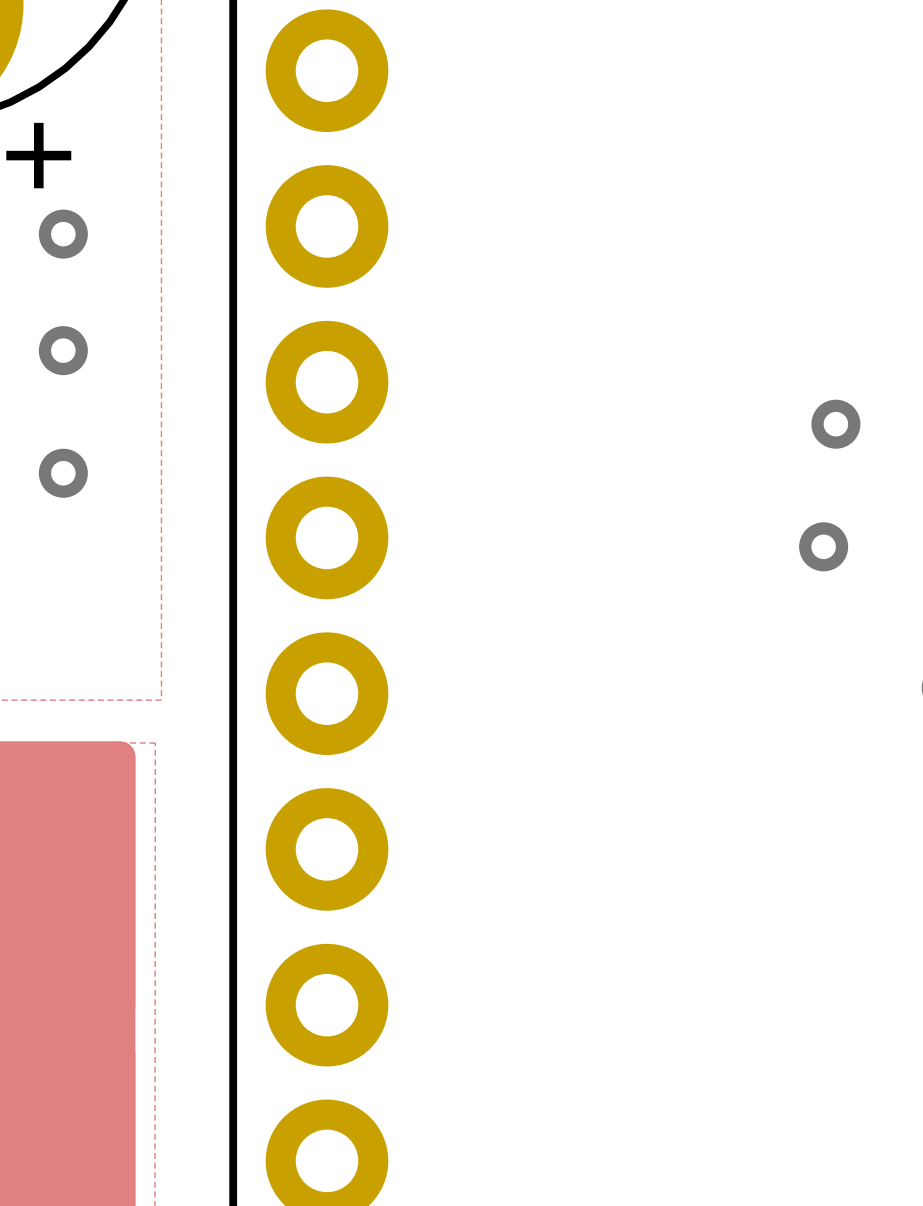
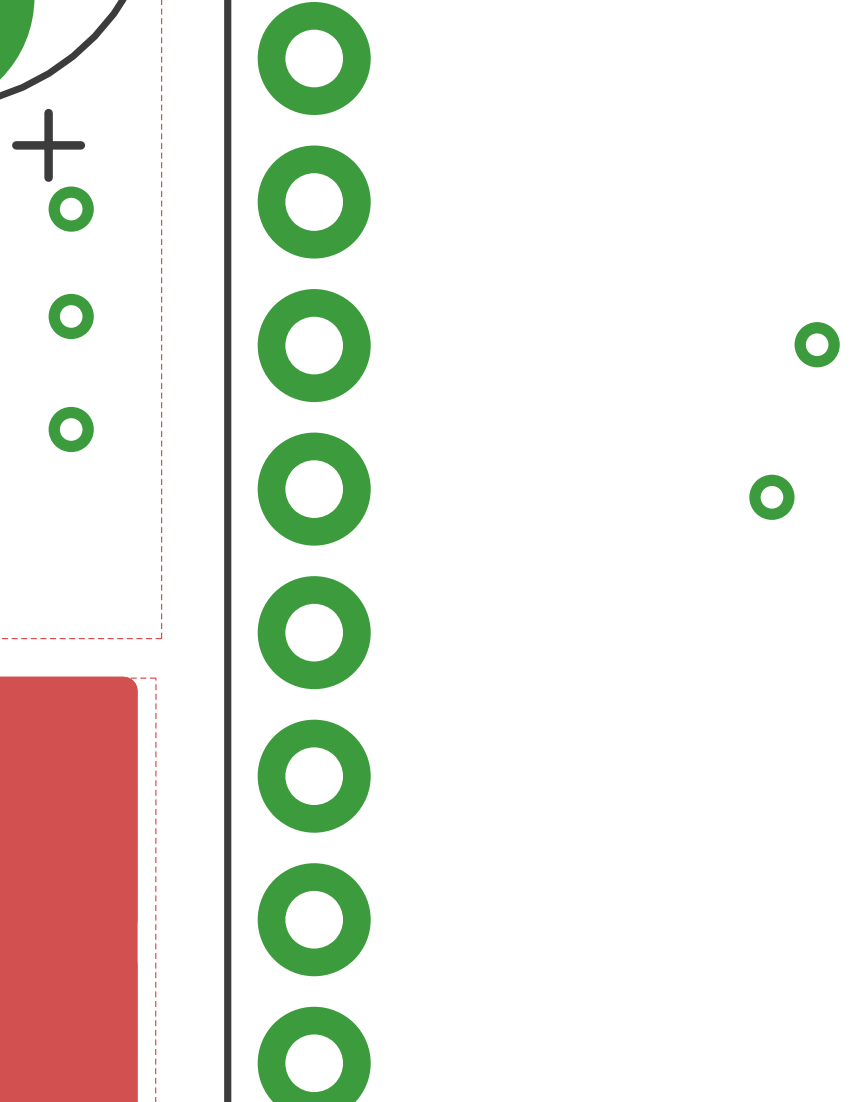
via position: (835, 424) -> (817, 344)

